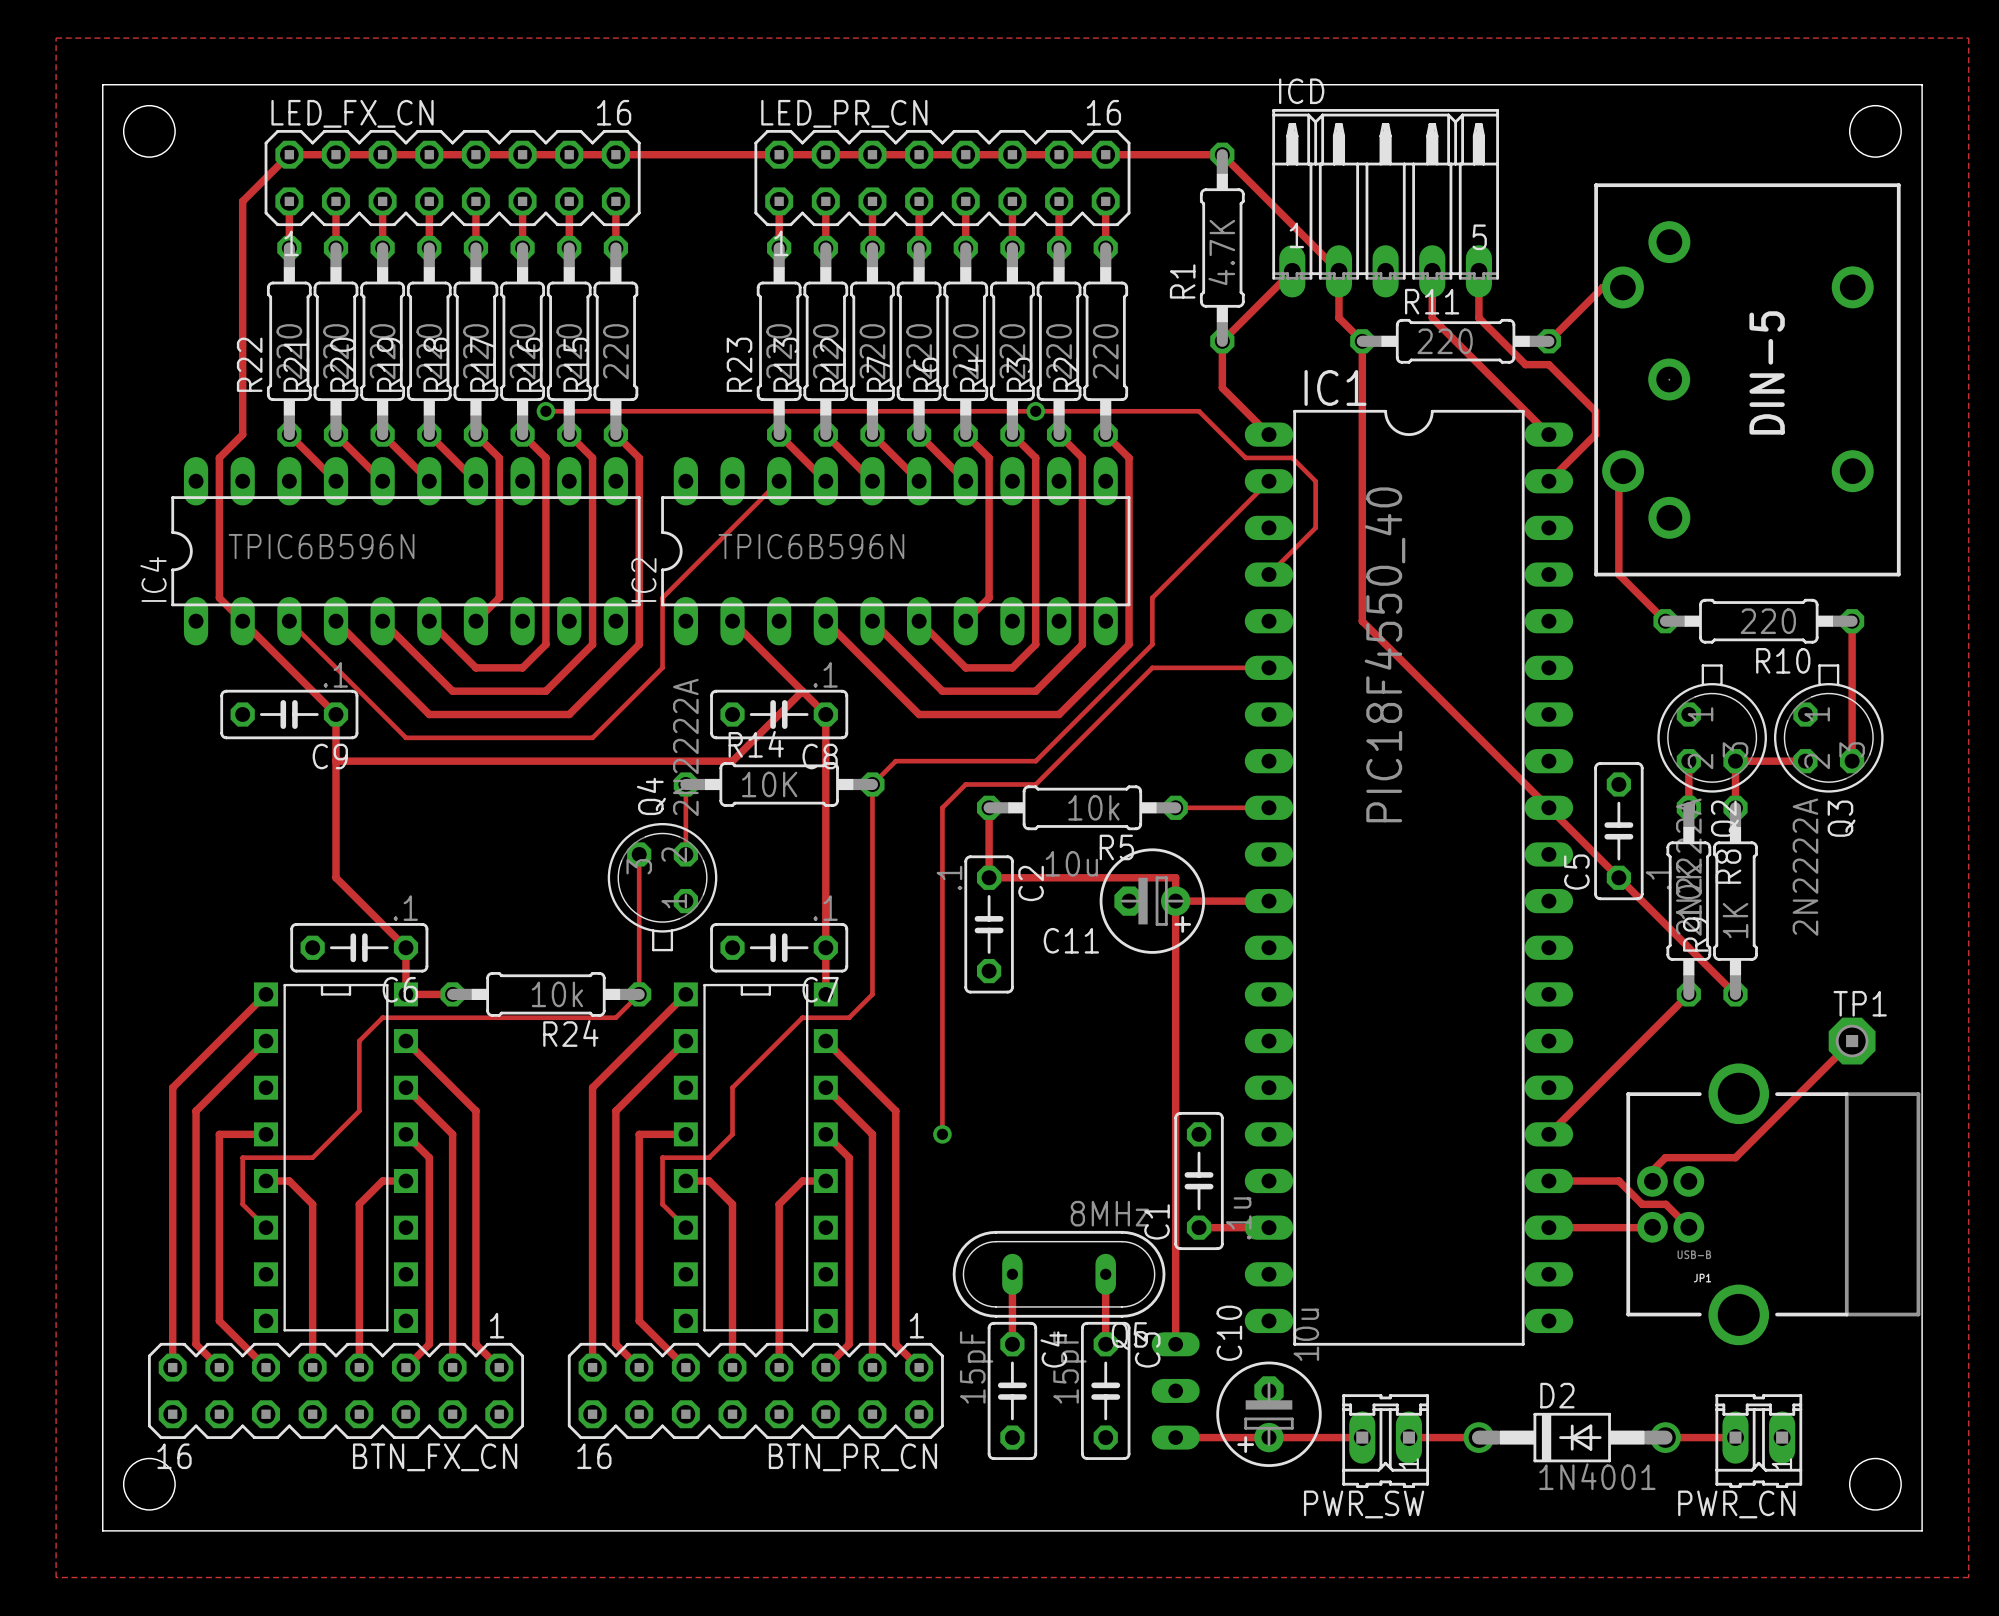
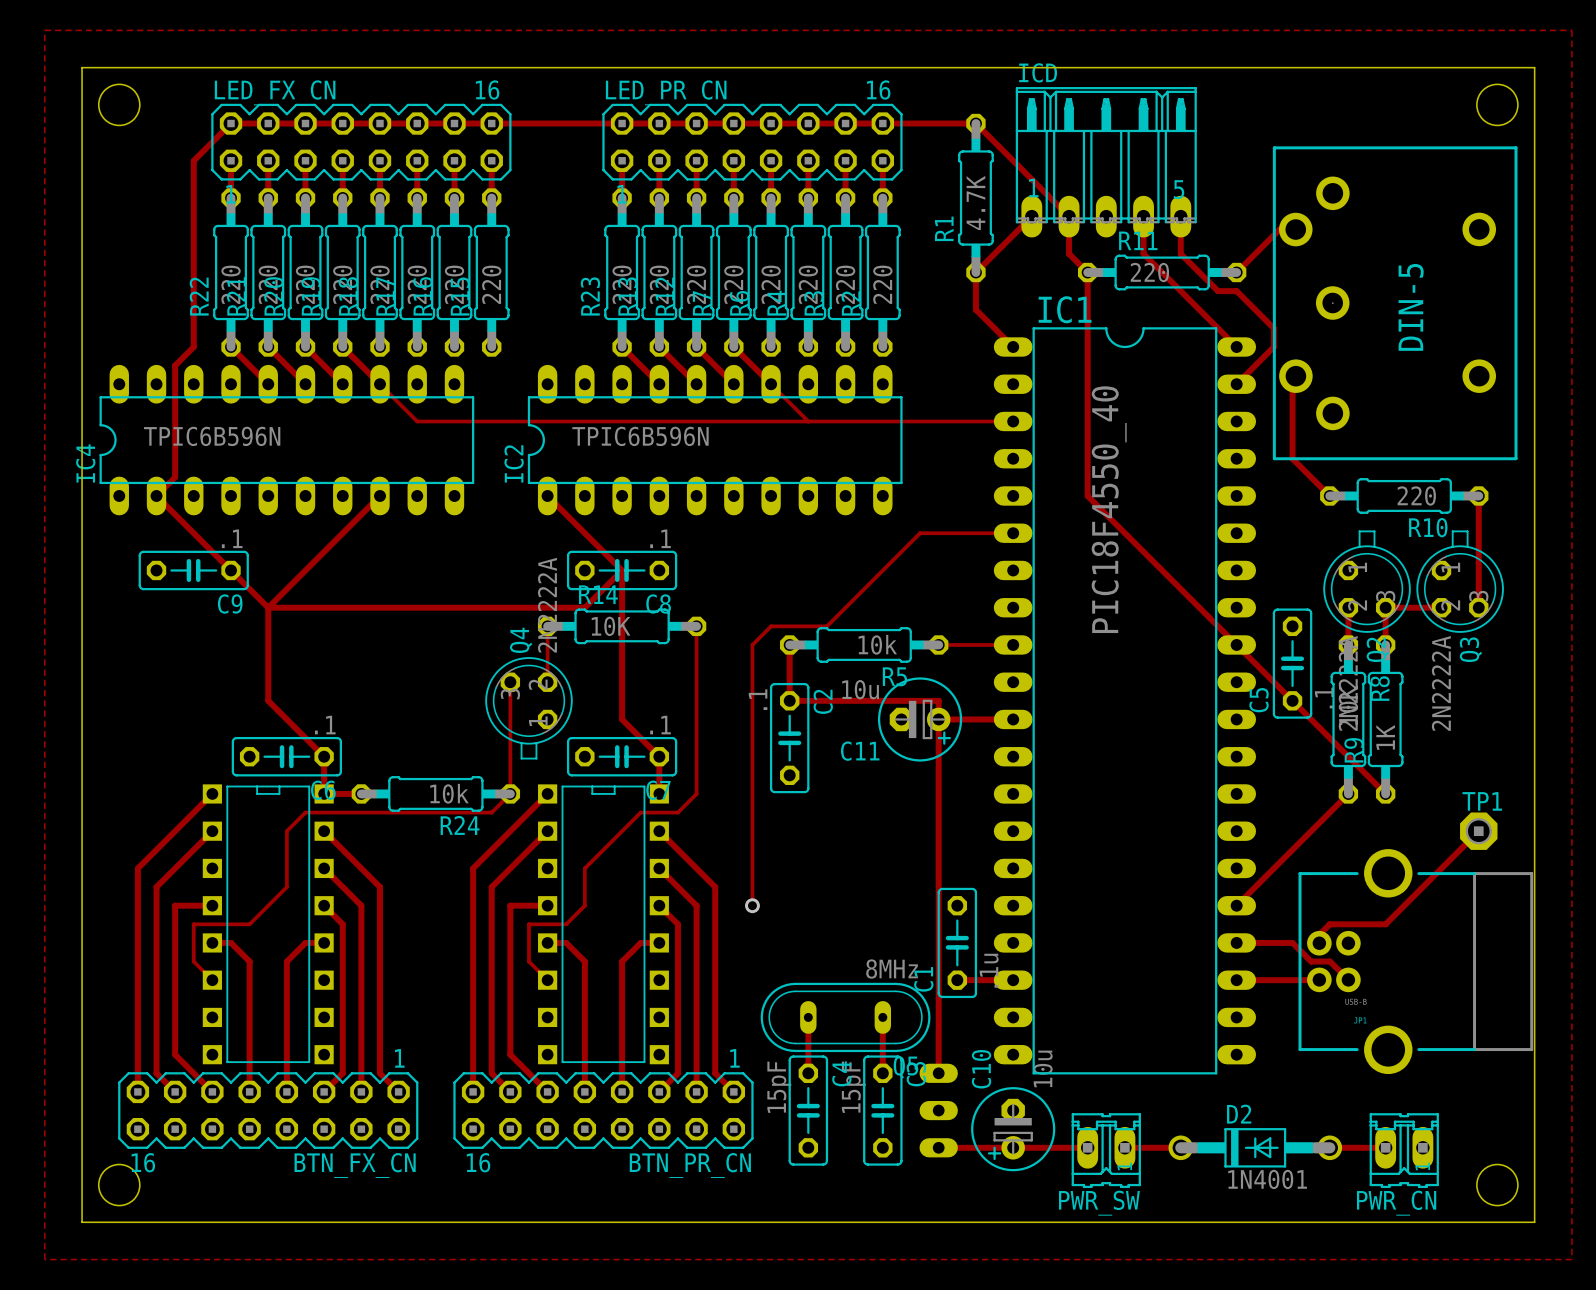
track: (545, 411) (1199, 411) (1245, 457) (1292, 457) (1315, 481) (1315, 527) (1268, 574) -> none
via: (545, 411) -> none
via: (1035, 411) -> none
track: (475, 434) (499, 457) (499, 597) (475, 621) -> none
track: (522, 434) (545, 457) (545, 644) (522, 667) (475, 667) (429, 621) -> none
track: (569, 434) (592, 457) (592, 644) (545, 691) (452, 691) (382, 621) -> none
track: (615, 434) (639, 457) (639, 644) (569, 714) (429, 714) (335, 621) -> none
track: (965, 434) (989, 457) (989, 597) (965, 621) -> none
track: (1012, 434) (1035, 457) (1035, 644) (1012, 667) (965, 667) (919, 621) -> none
track: (1059, 434) (1082, 457) (1082, 644) (1035, 691) (942, 691) (872, 621) -> none
track: (1105, 434) (1129, 457) (1129, 644) (1059, 714) (919, 714) (825, 621) -> none
track: none -> (380, 384) (417, 421) (1013, 421)
track: (779, 481) (662, 597) (662, 667) (592, 737) (405, 737) (289, 621) -> none
track: none -> (771, 384) (808, 421)
track: (1268, 481) (1152, 597) (1152, 644) (1035, 761) (895, 761) (872, 784) -> none
IC4 position: (405, 551) -> (286, 440)
track: (219, 597) (335, 714) (335, 761) -> (175, 477) (156, 495) (268, 607) (380, 495)
track: (732, 621) (825, 714) (825, 947) -> (547, 495) (622, 570) (622, 719) (659, 756)
track: (802, 691) (779, 714) -> none
C9 position: (289, 714) -> (193, 570)

